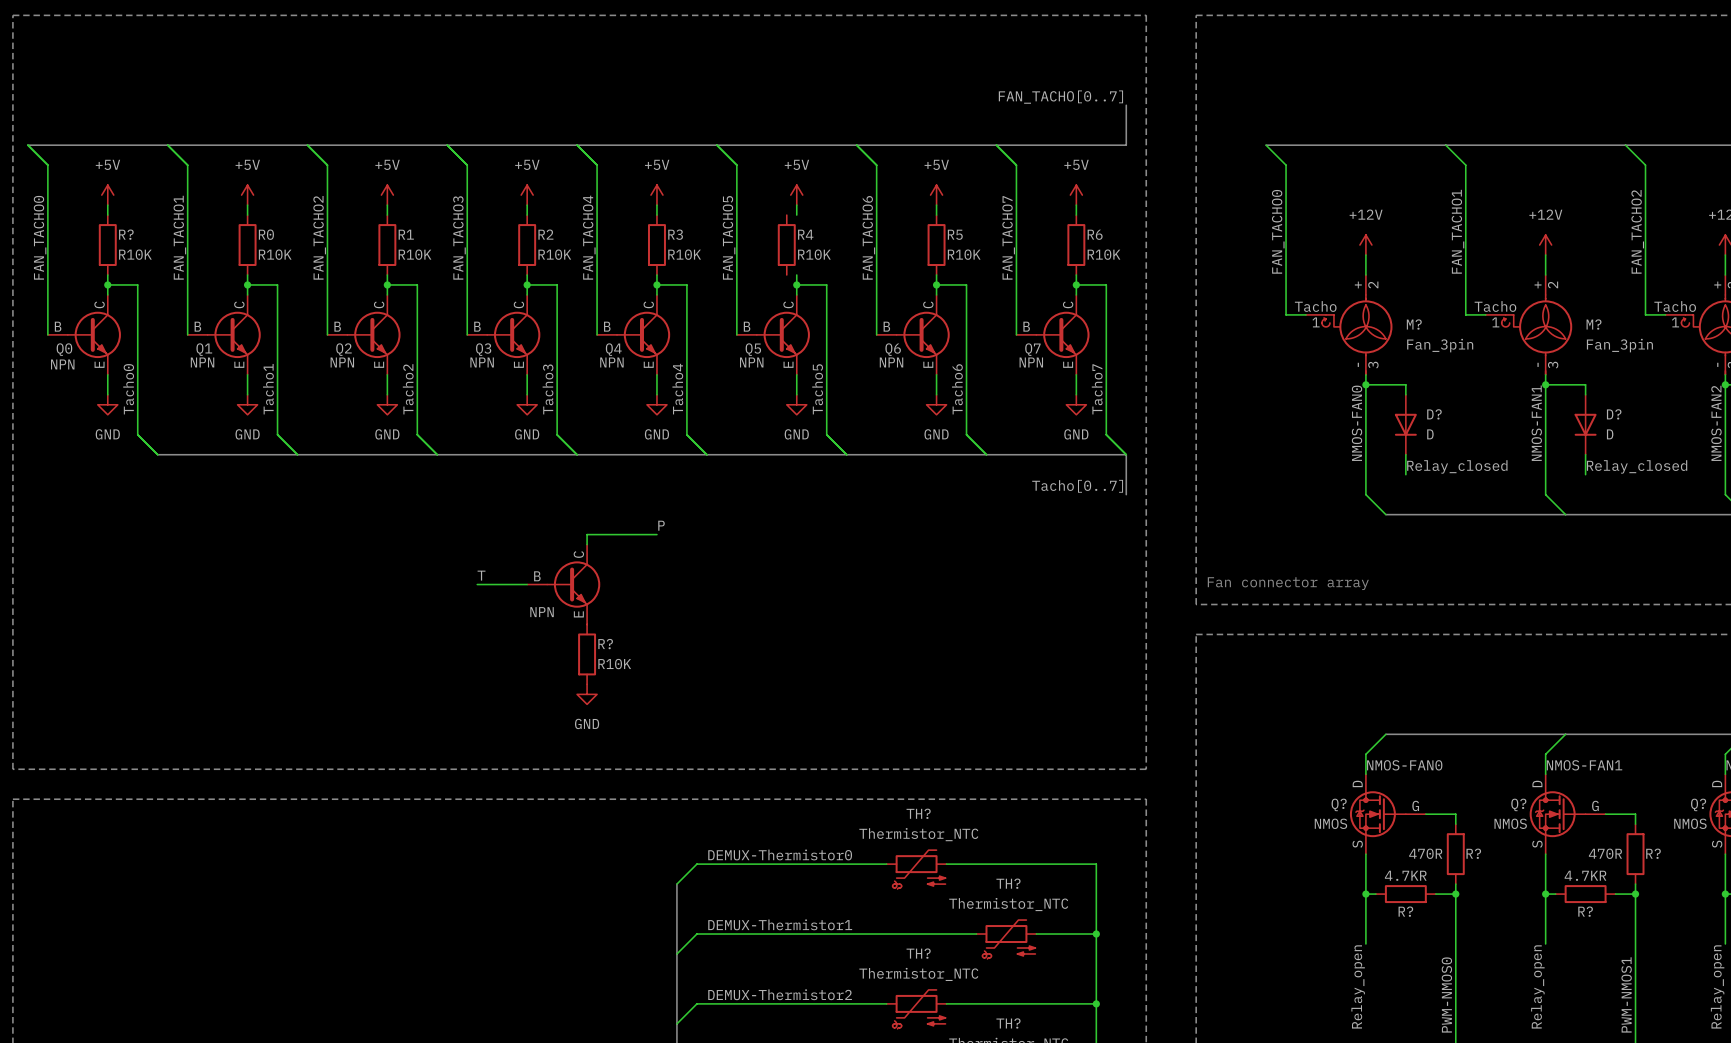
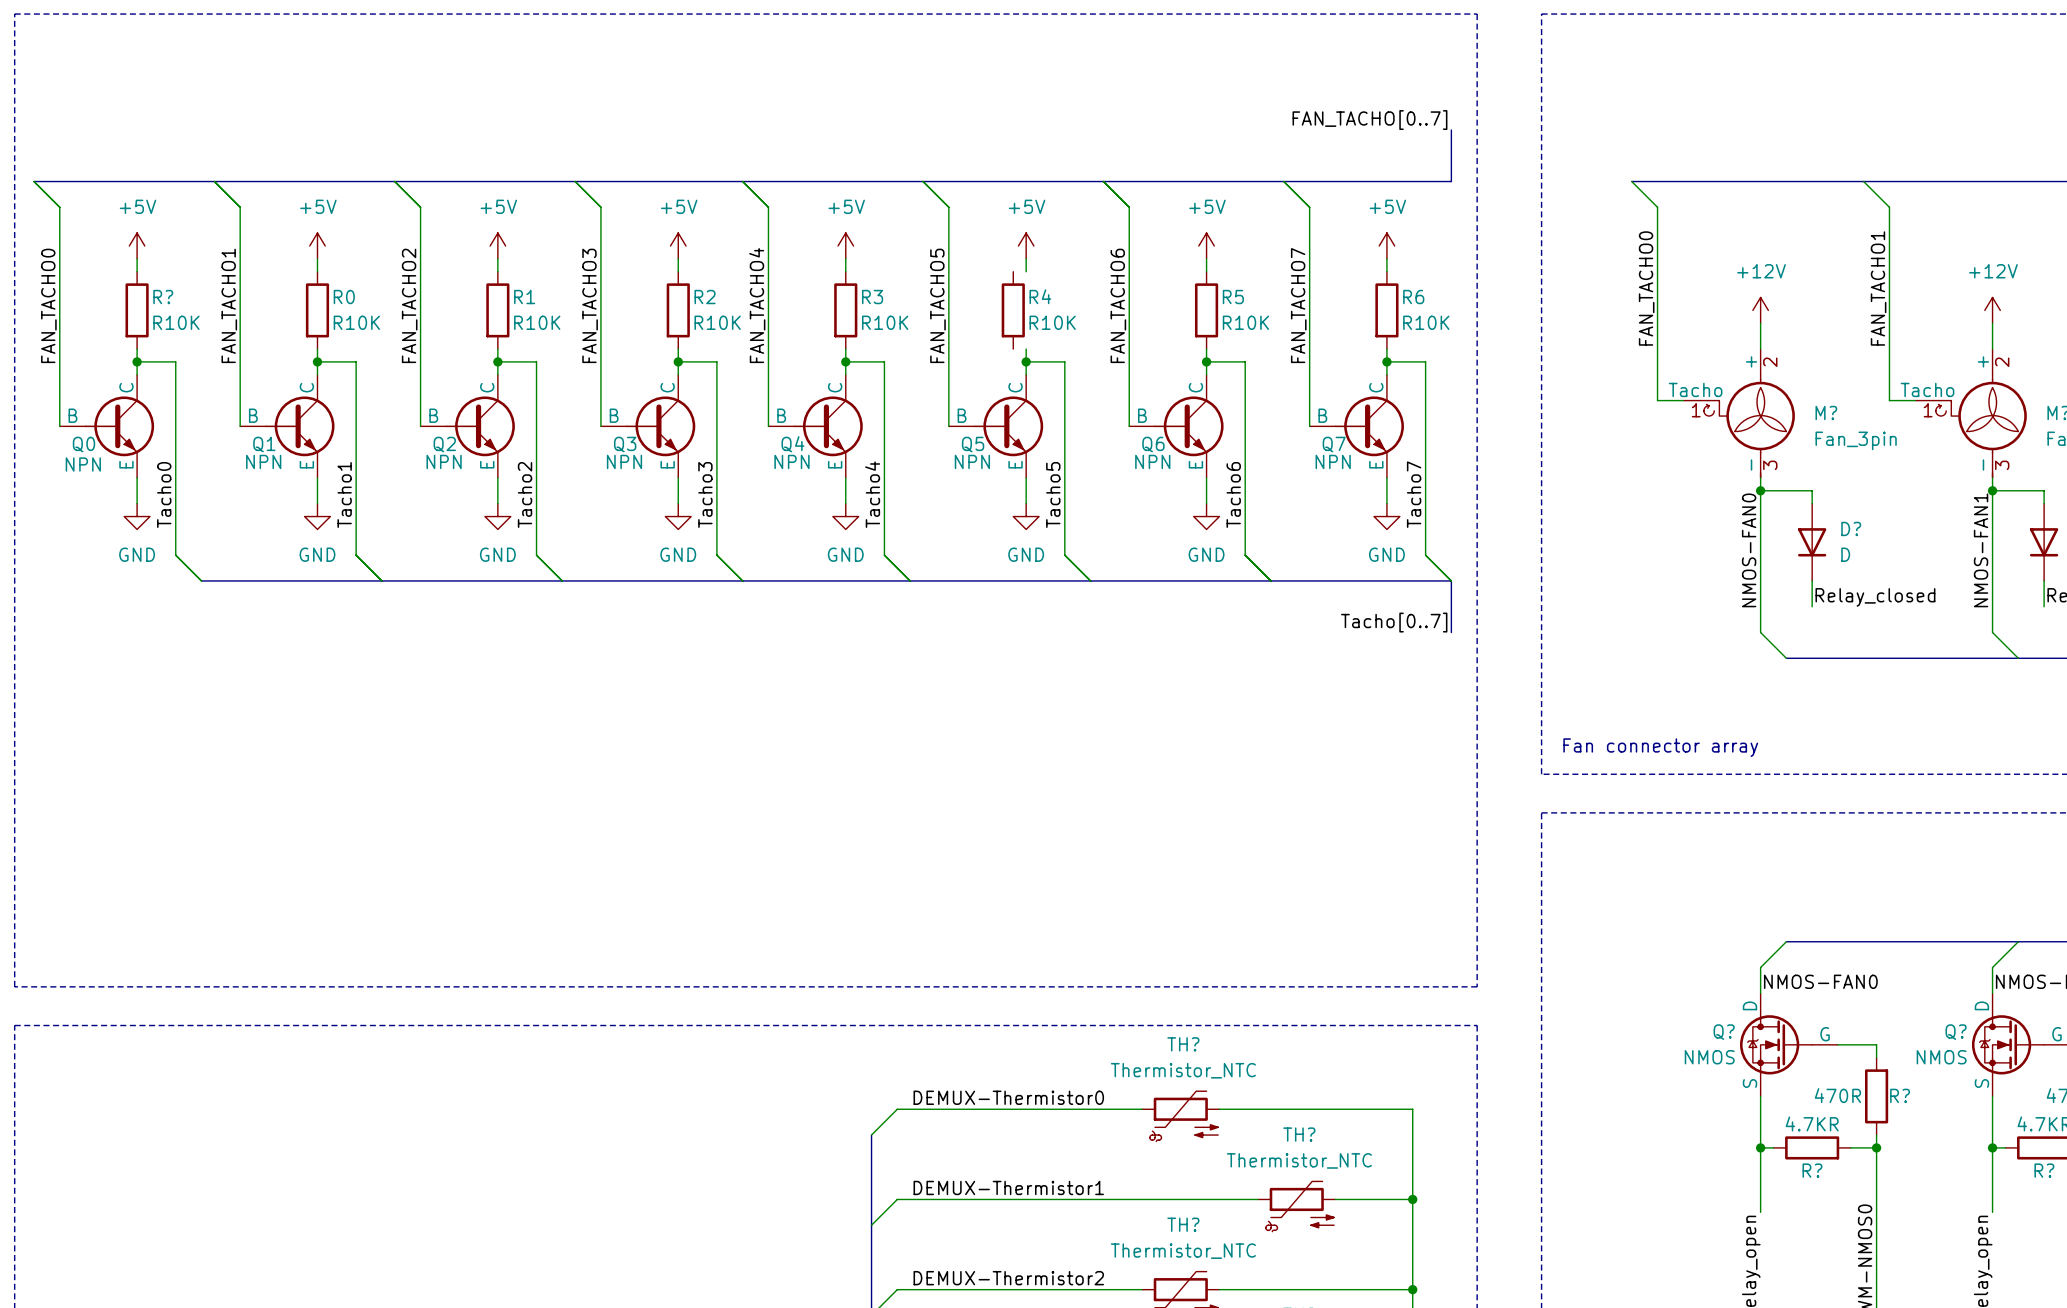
label: P (661, 525) -> none
wire: (656, 534) (587, 534) (587, 544) -> none
label: T (481, 575) -> none
wire: (477, 584) (527, 584) -> none
part: NPN (563, 584) -> none
R?: R10K (587, 654) -> none
power symbol: GND (587, 694) -> none

